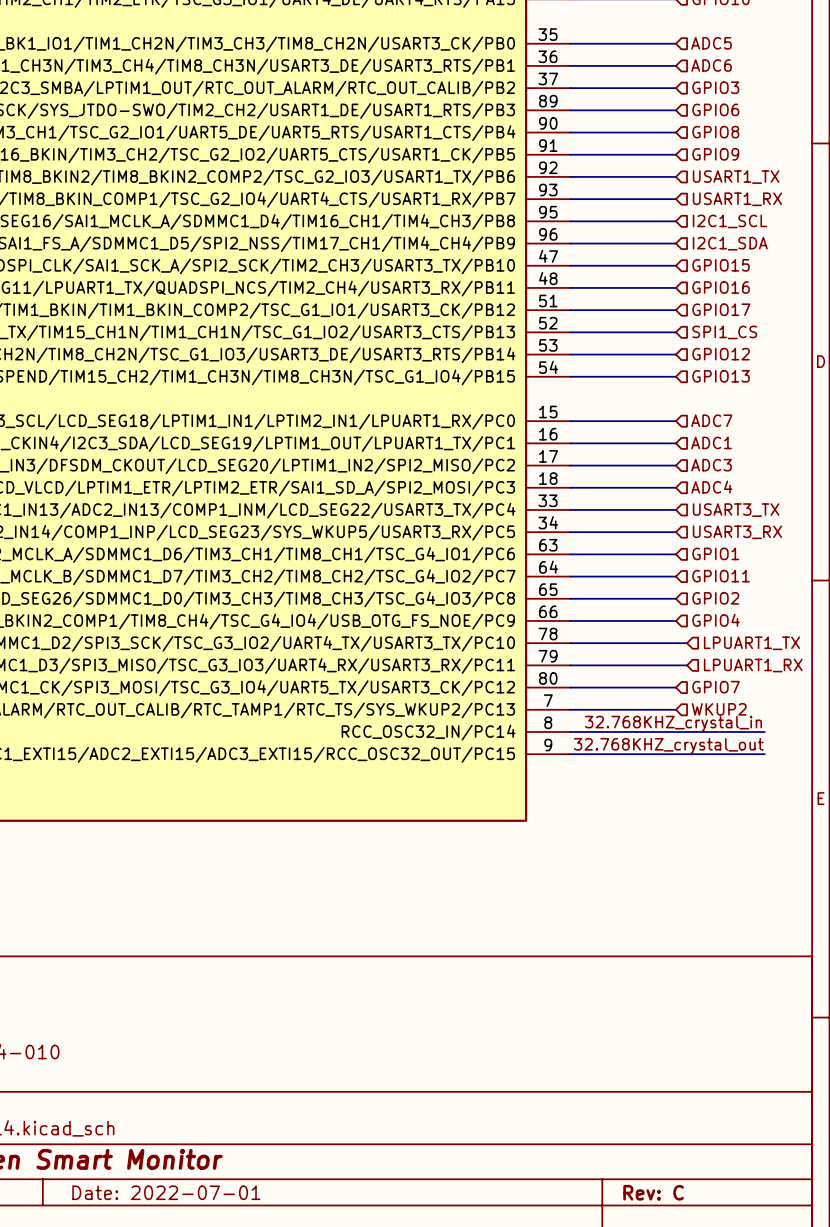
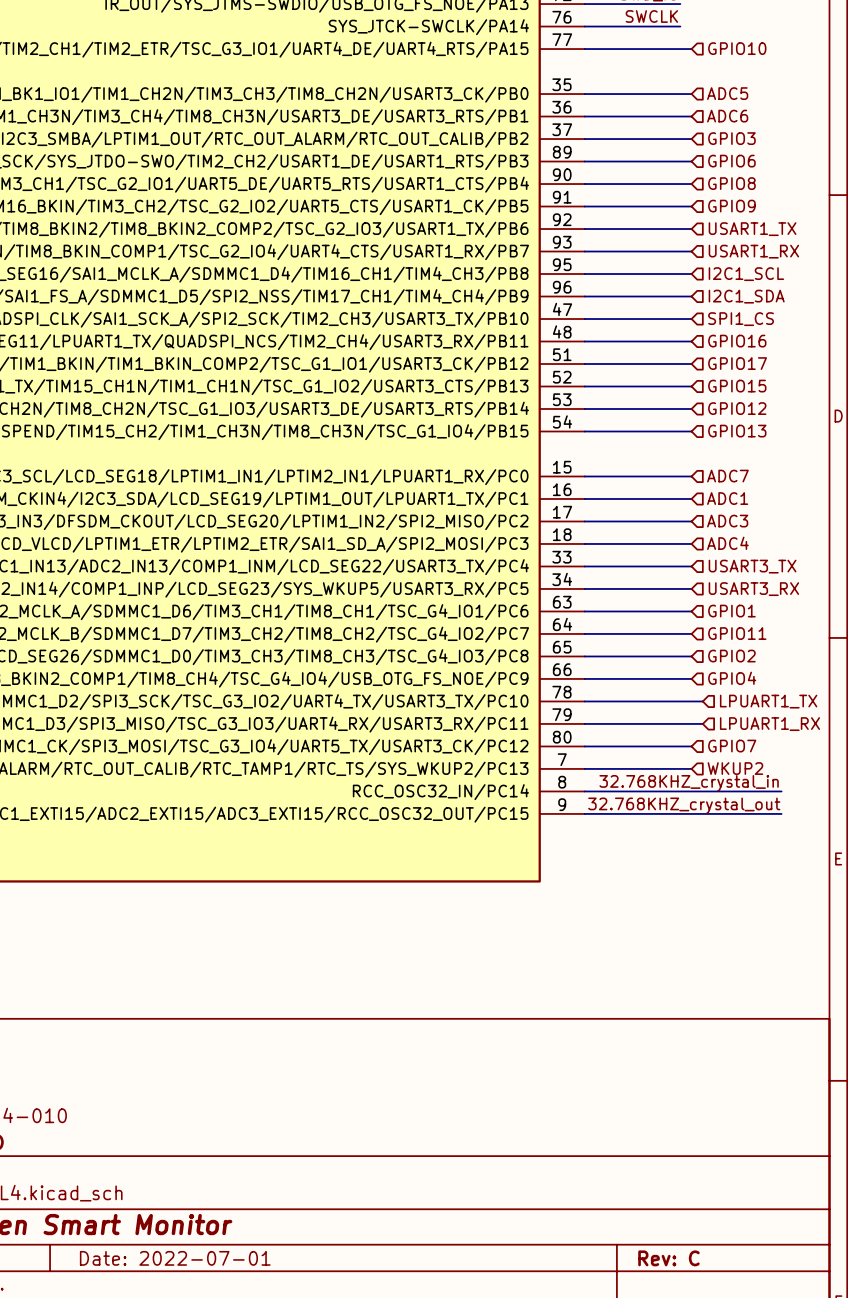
hierarchical label: GPIO15 (721, 265) -> SPI1_CS (741, 319)
hierarchical label: SPI1_CS (724, 332) -> GPIO15 (737, 386)

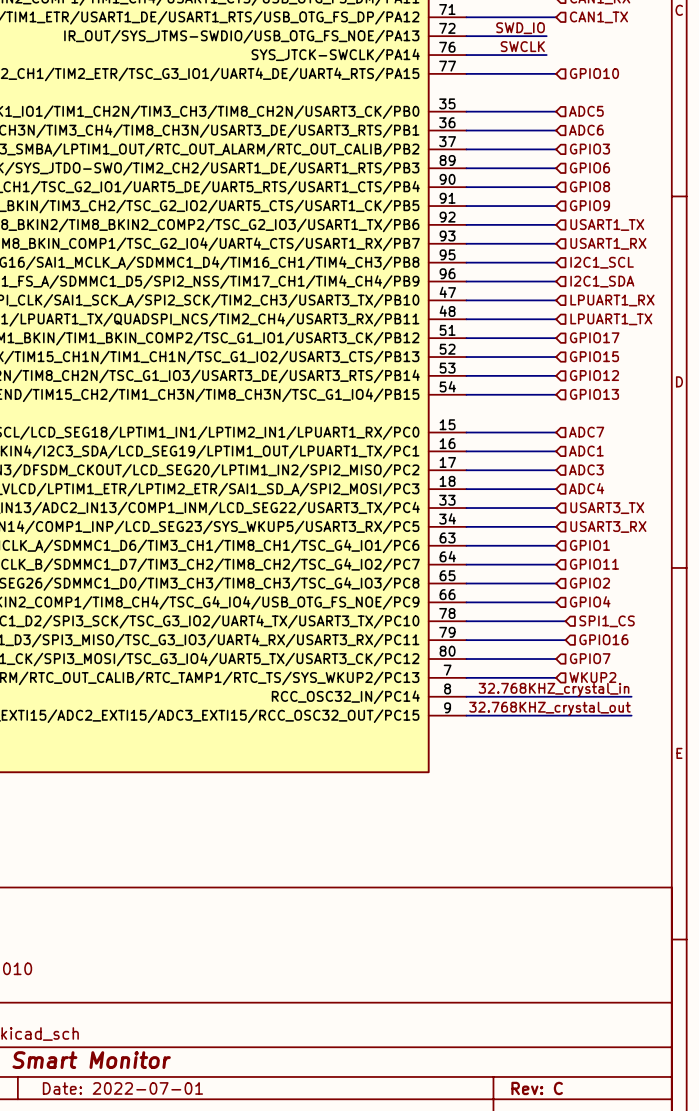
hierarchical label: SPI1_CS (741, 319) -> LPUART1_RX (612, 300)
hierarchical label: GPIO16 (737, 341) -> LPUART1_TX (611, 319)
hierarchical label: LPUART1_TX (768, 701) -> SPI1_CS (607, 621)
hierarchical label: LPUART1_RX (769, 724) -> GPIO16 (603, 639)

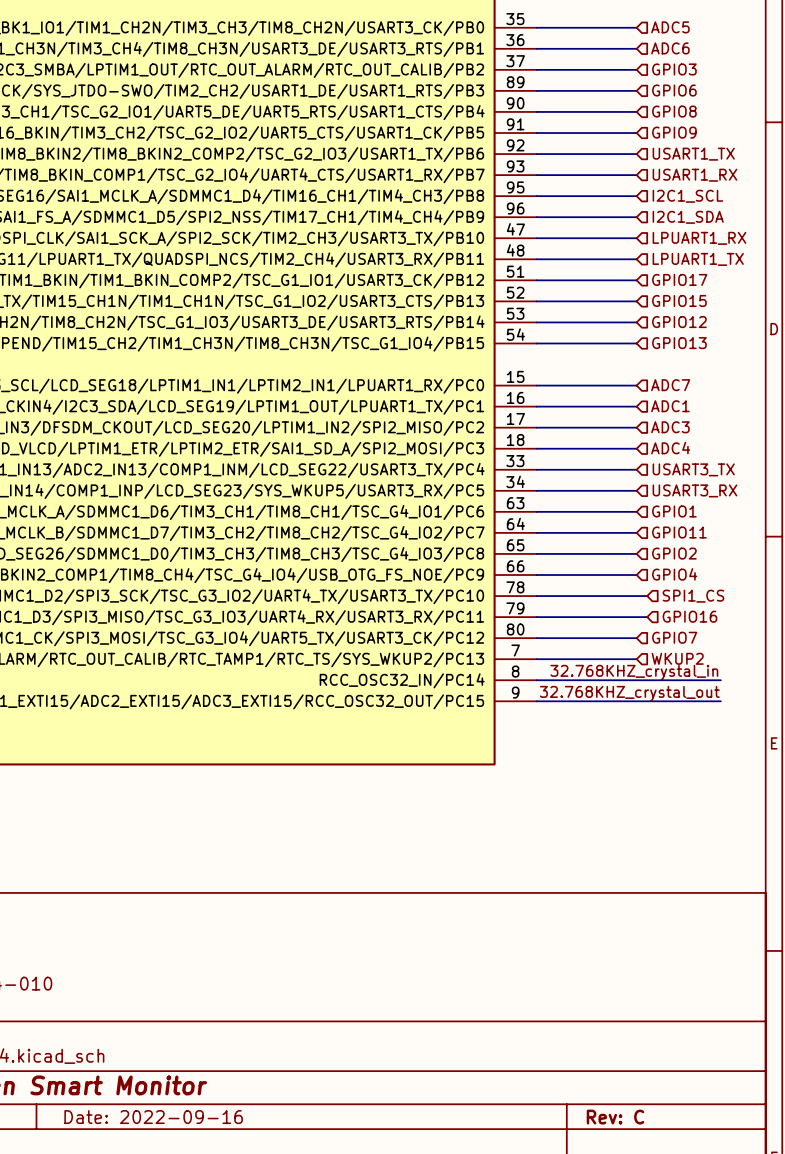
title block: Date: 2022-07-01 (122, 1088) -> Date: 2022-09-16 (153, 1117)

